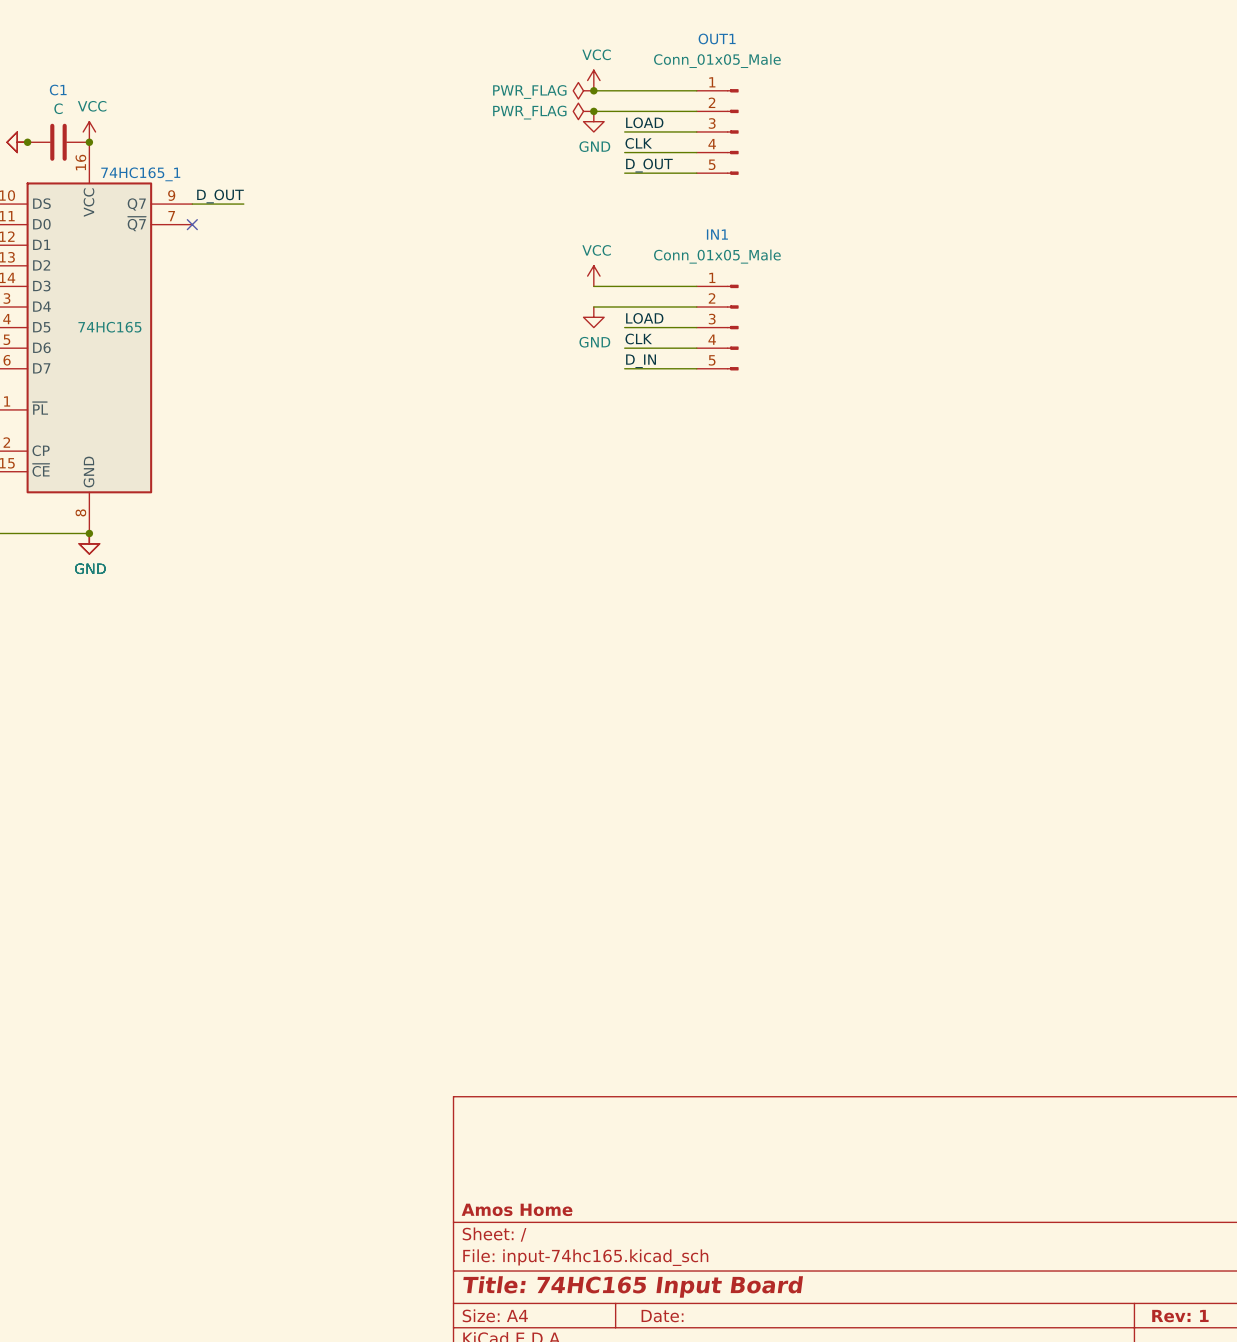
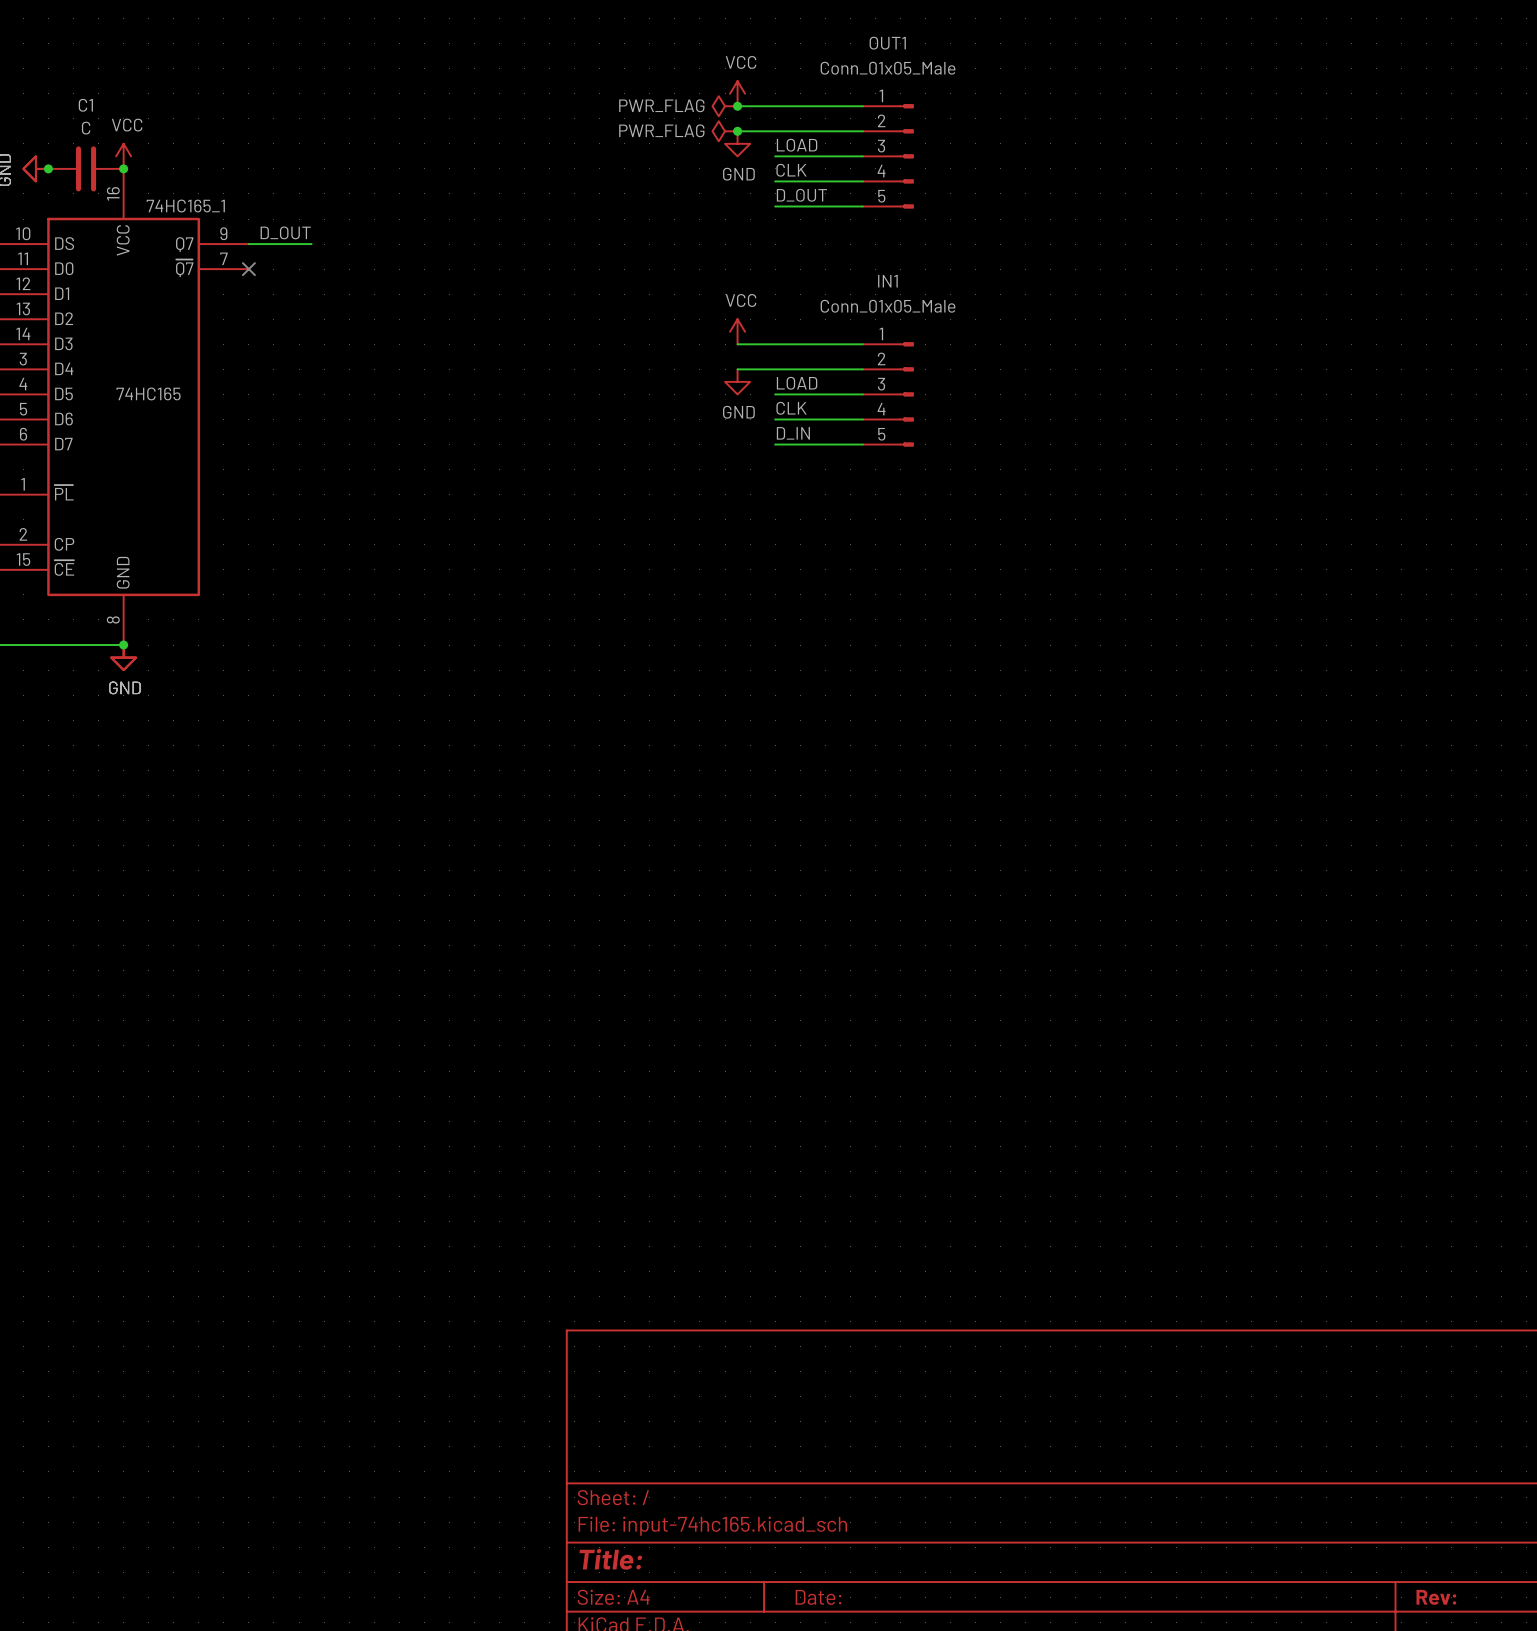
title block: Amos Home (517, 1209) -> none
title block: Title: 74HC165 Input Board (633, 1286) -> Title: (610, 1559)
title block: Rev: 1 (1180, 1316) -> Rev: (1436, 1597)

